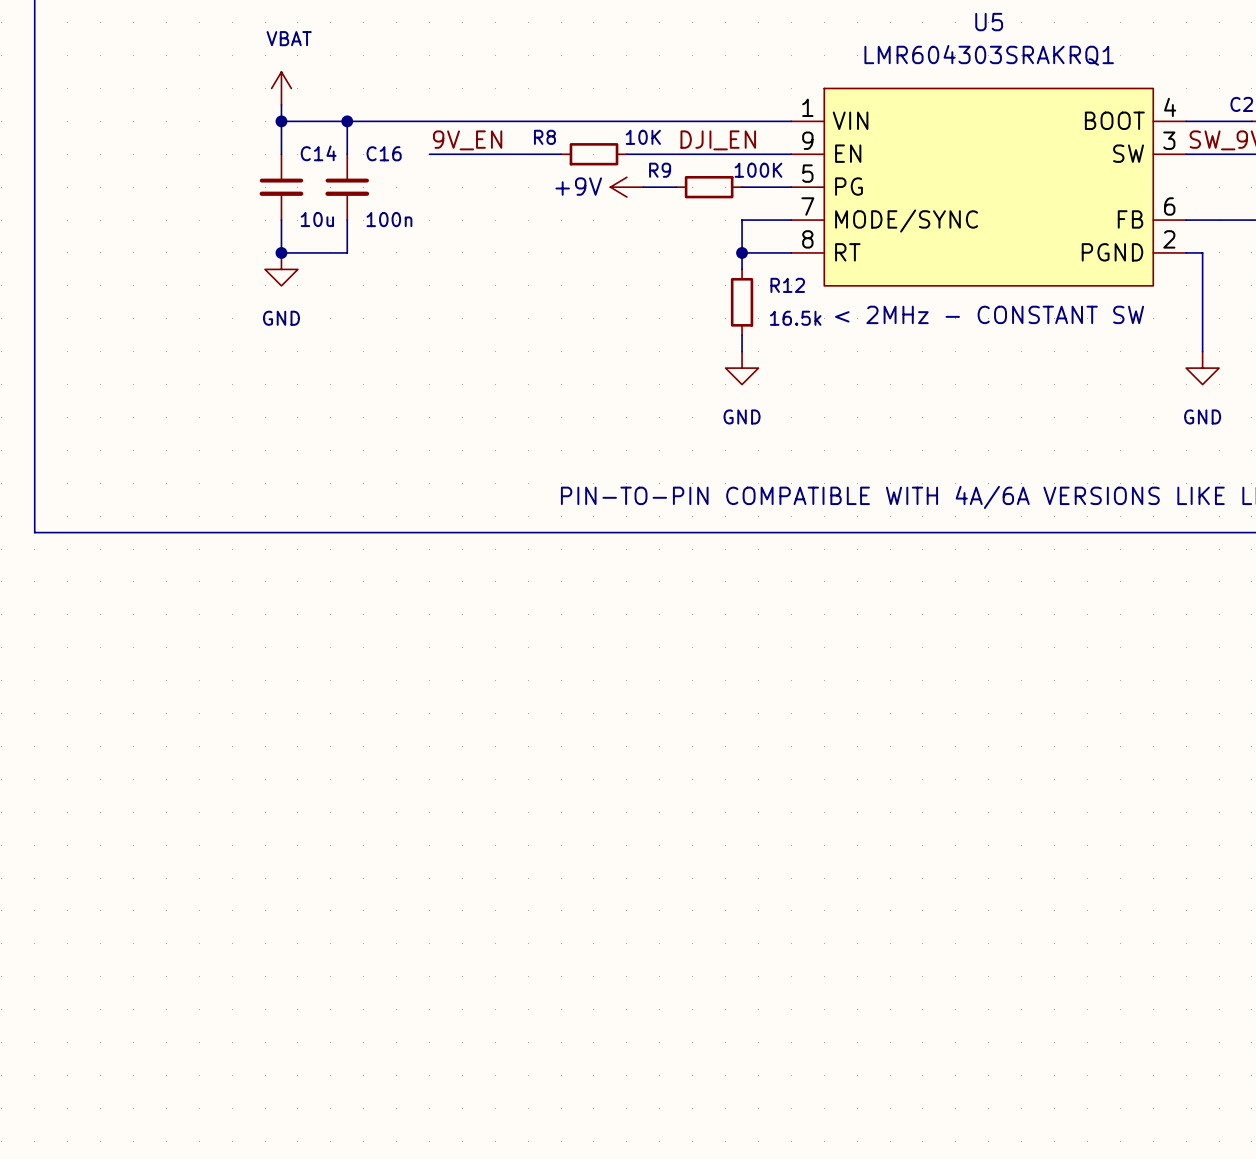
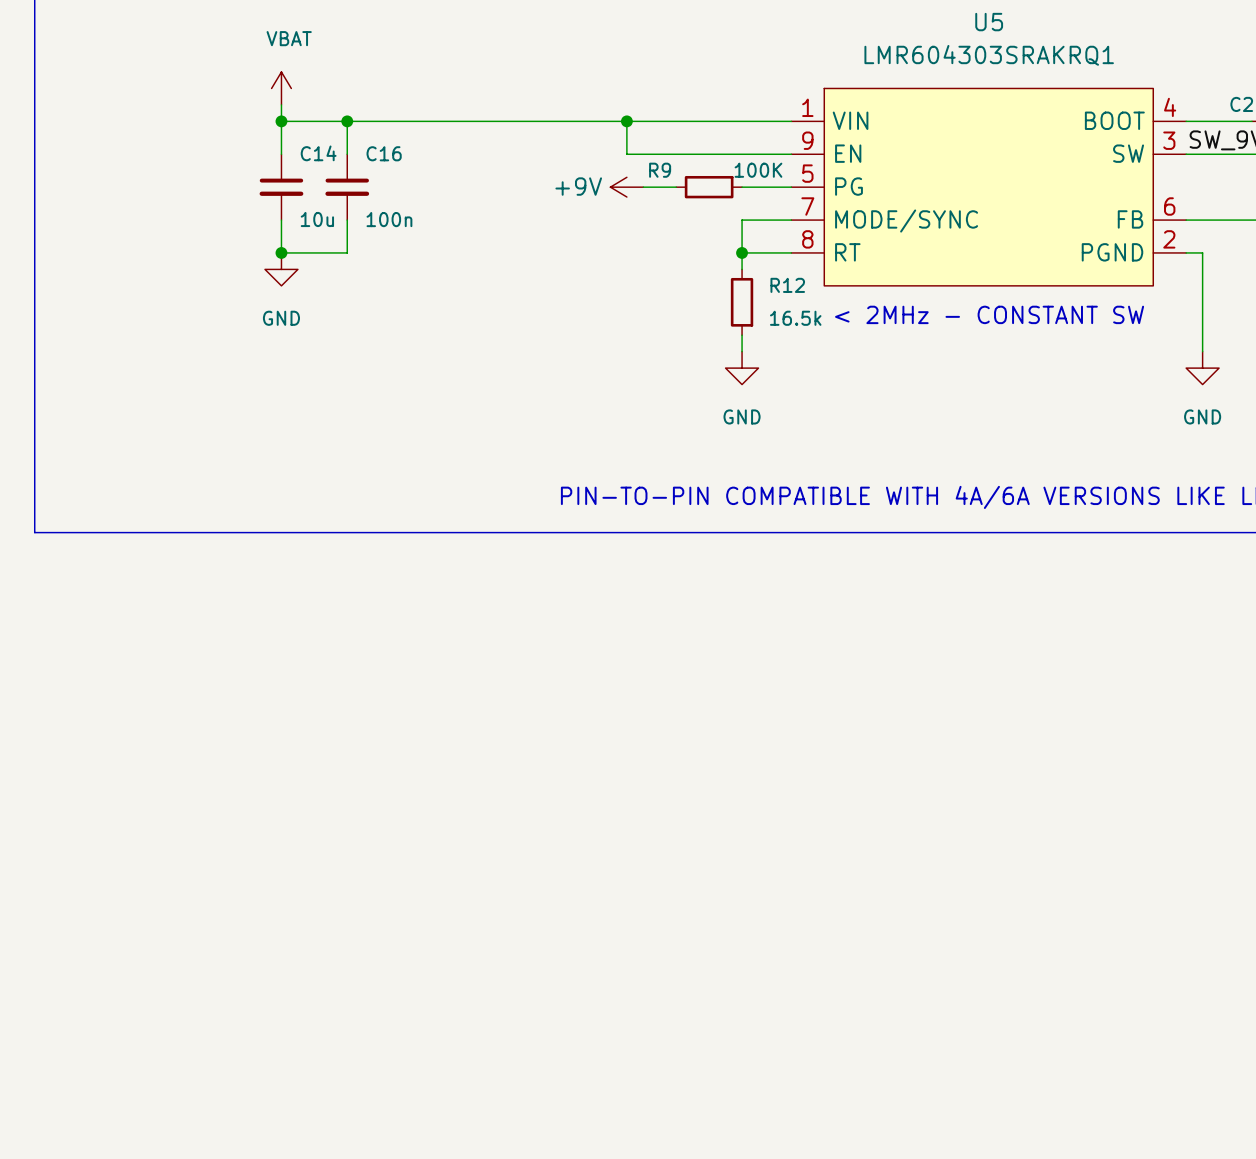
wire: none -> (626, 121) (626, 154)
junction: none -> (626, 121)
label: 9V_EN (467, 140) -> none
label: DJI_EN (718, 140) -> none
wire: (429, 154) (561, 154) -> none
R8: 10K (593, 154) -> none

